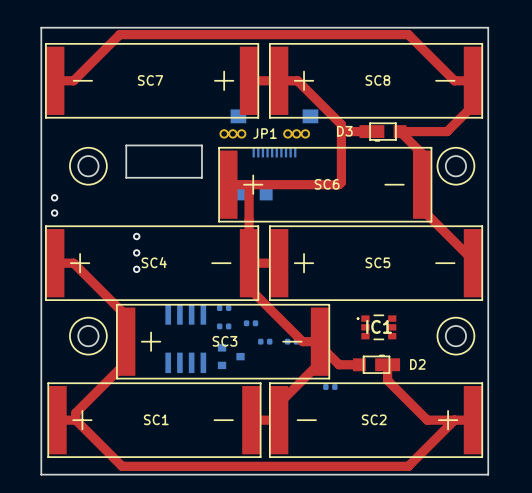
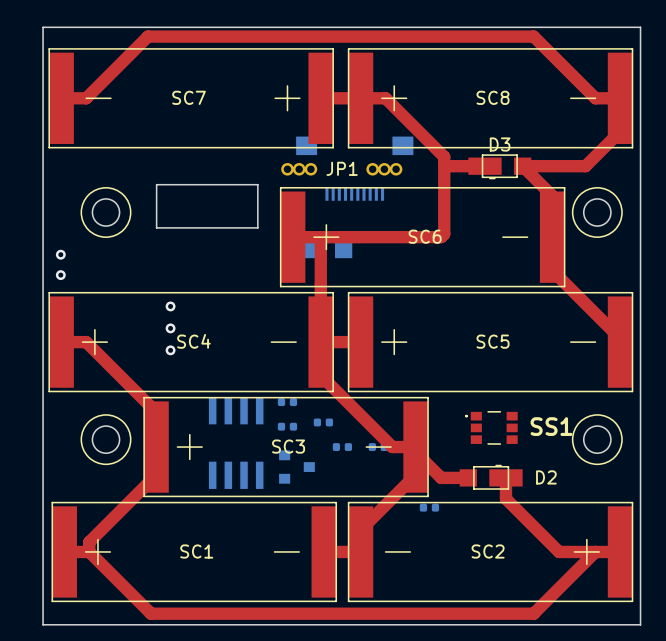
D3 name position: D3 (344, 131) -> D3 (500, 144)
IC1 name: IC1 (379, 326) -> SS1 (551, 426)

